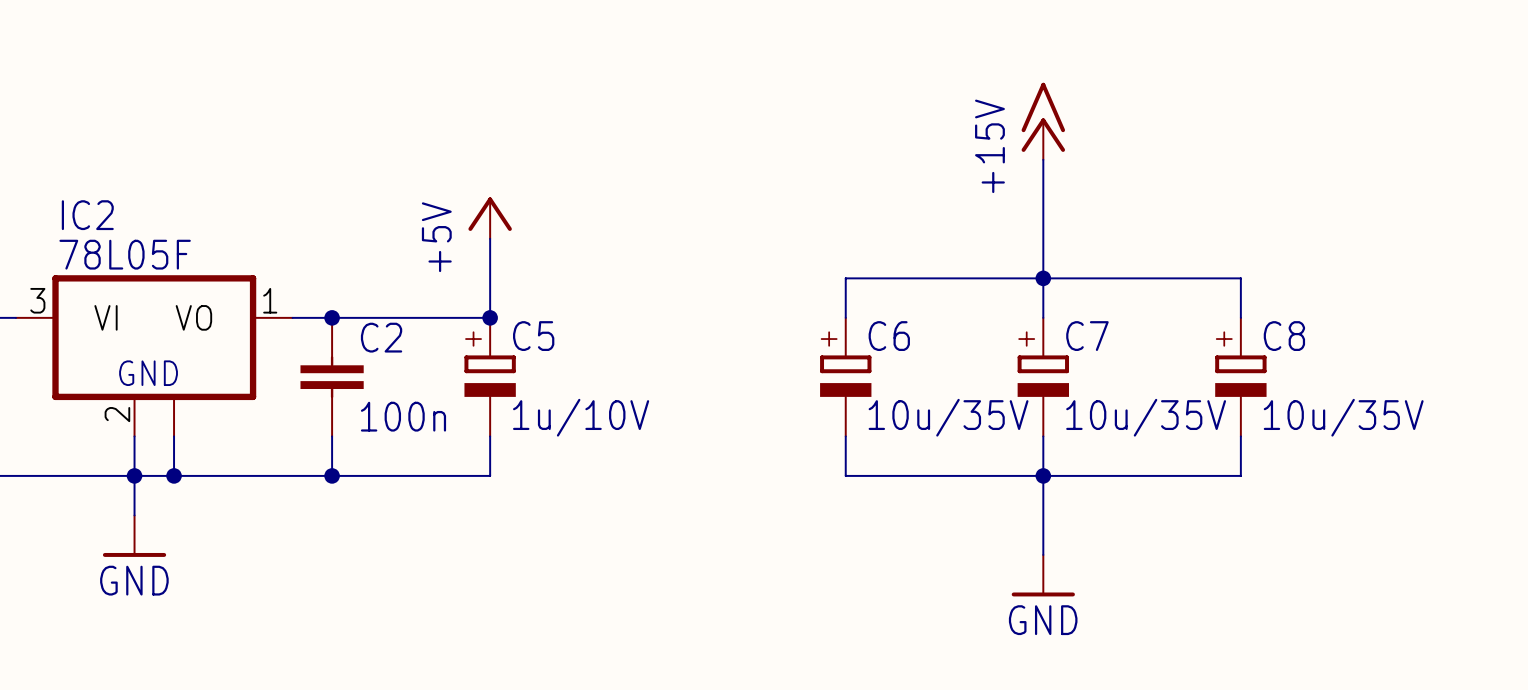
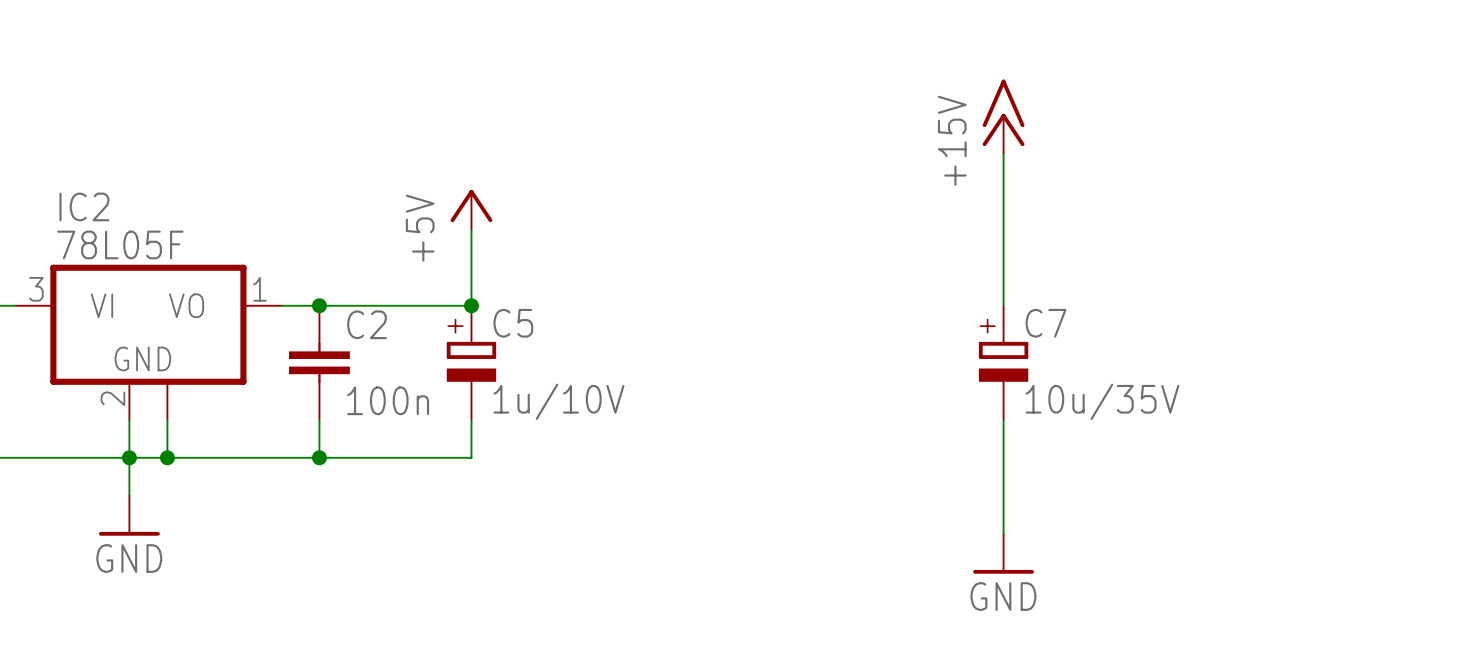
junction: (1043, 278) -> none
wire: (845, 317) (845, 278) (1240, 278) (1240, 317) -> none
C6: 10u/35V (845, 377) -> none
C8: 10u/35V (1240, 377) -> none
wire: (845, 436) (845, 475) (1240, 475) (1240, 436) -> none
junction: (1043, 475) -> none

